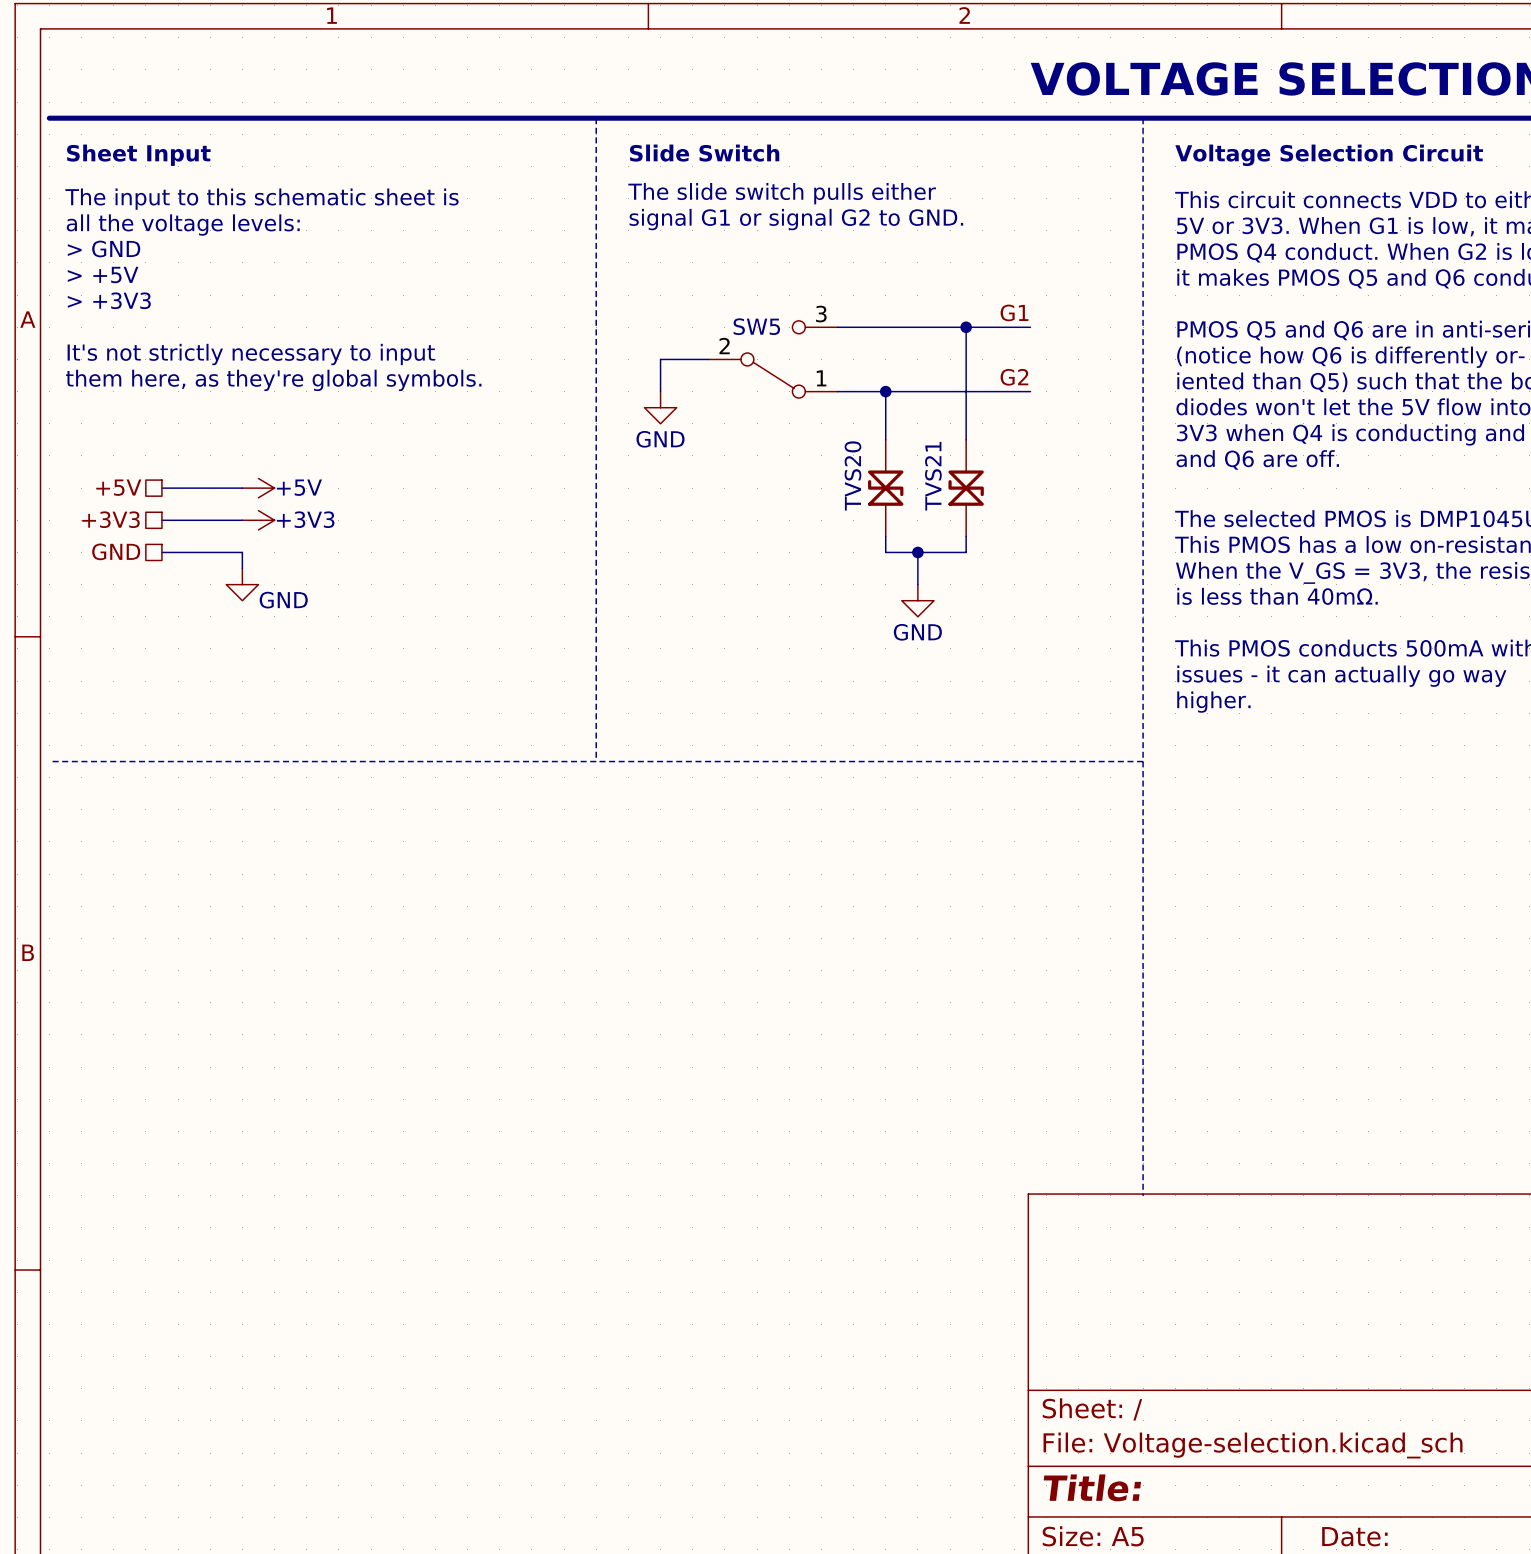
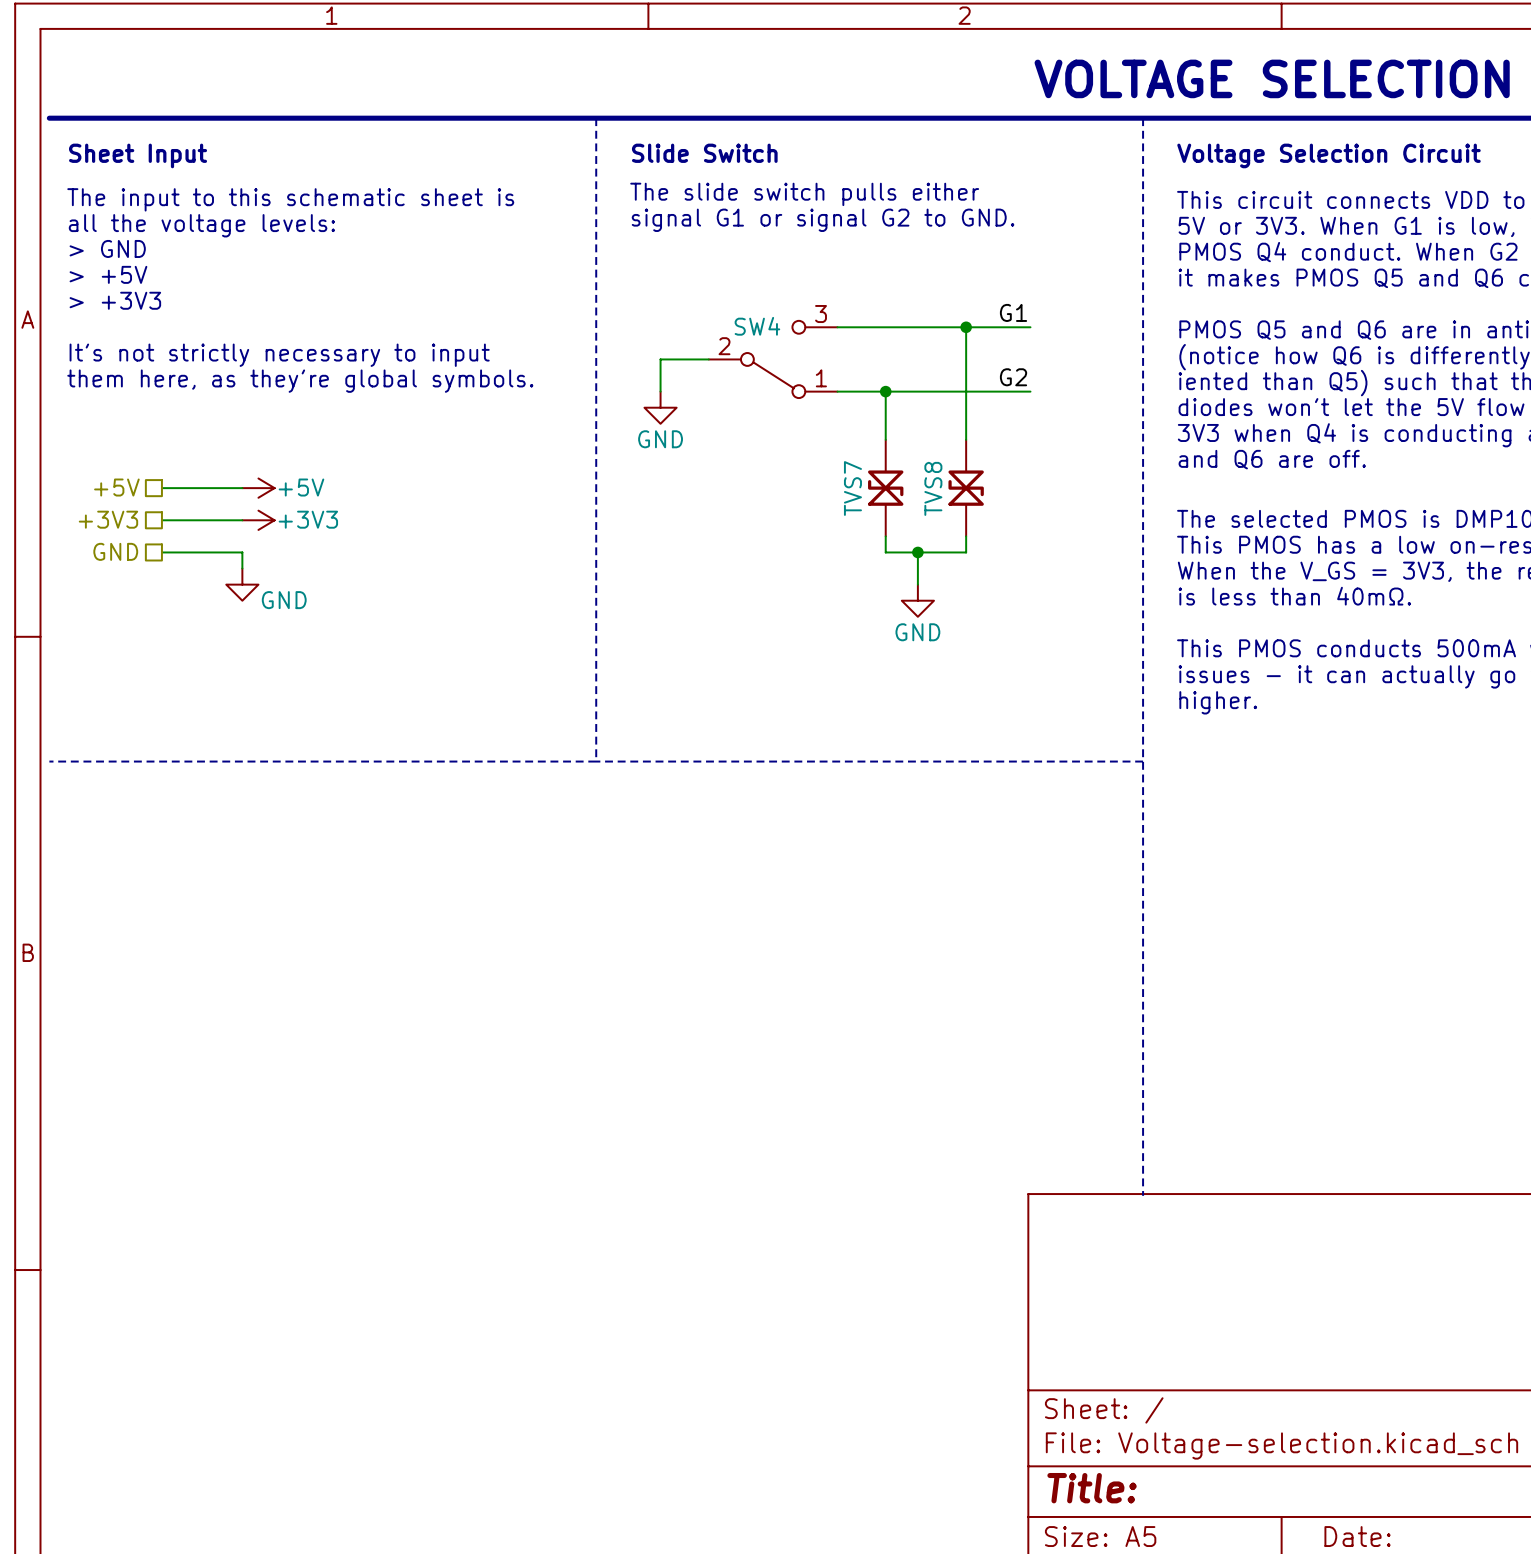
SW5 name: SW5 (756, 326) -> SW4 (757, 326)
TVS20 name: TVS20 (852, 475) -> TVS7 (852, 488)
TVS21 name: TVS21 (933, 476) -> TVS8 (933, 488)

